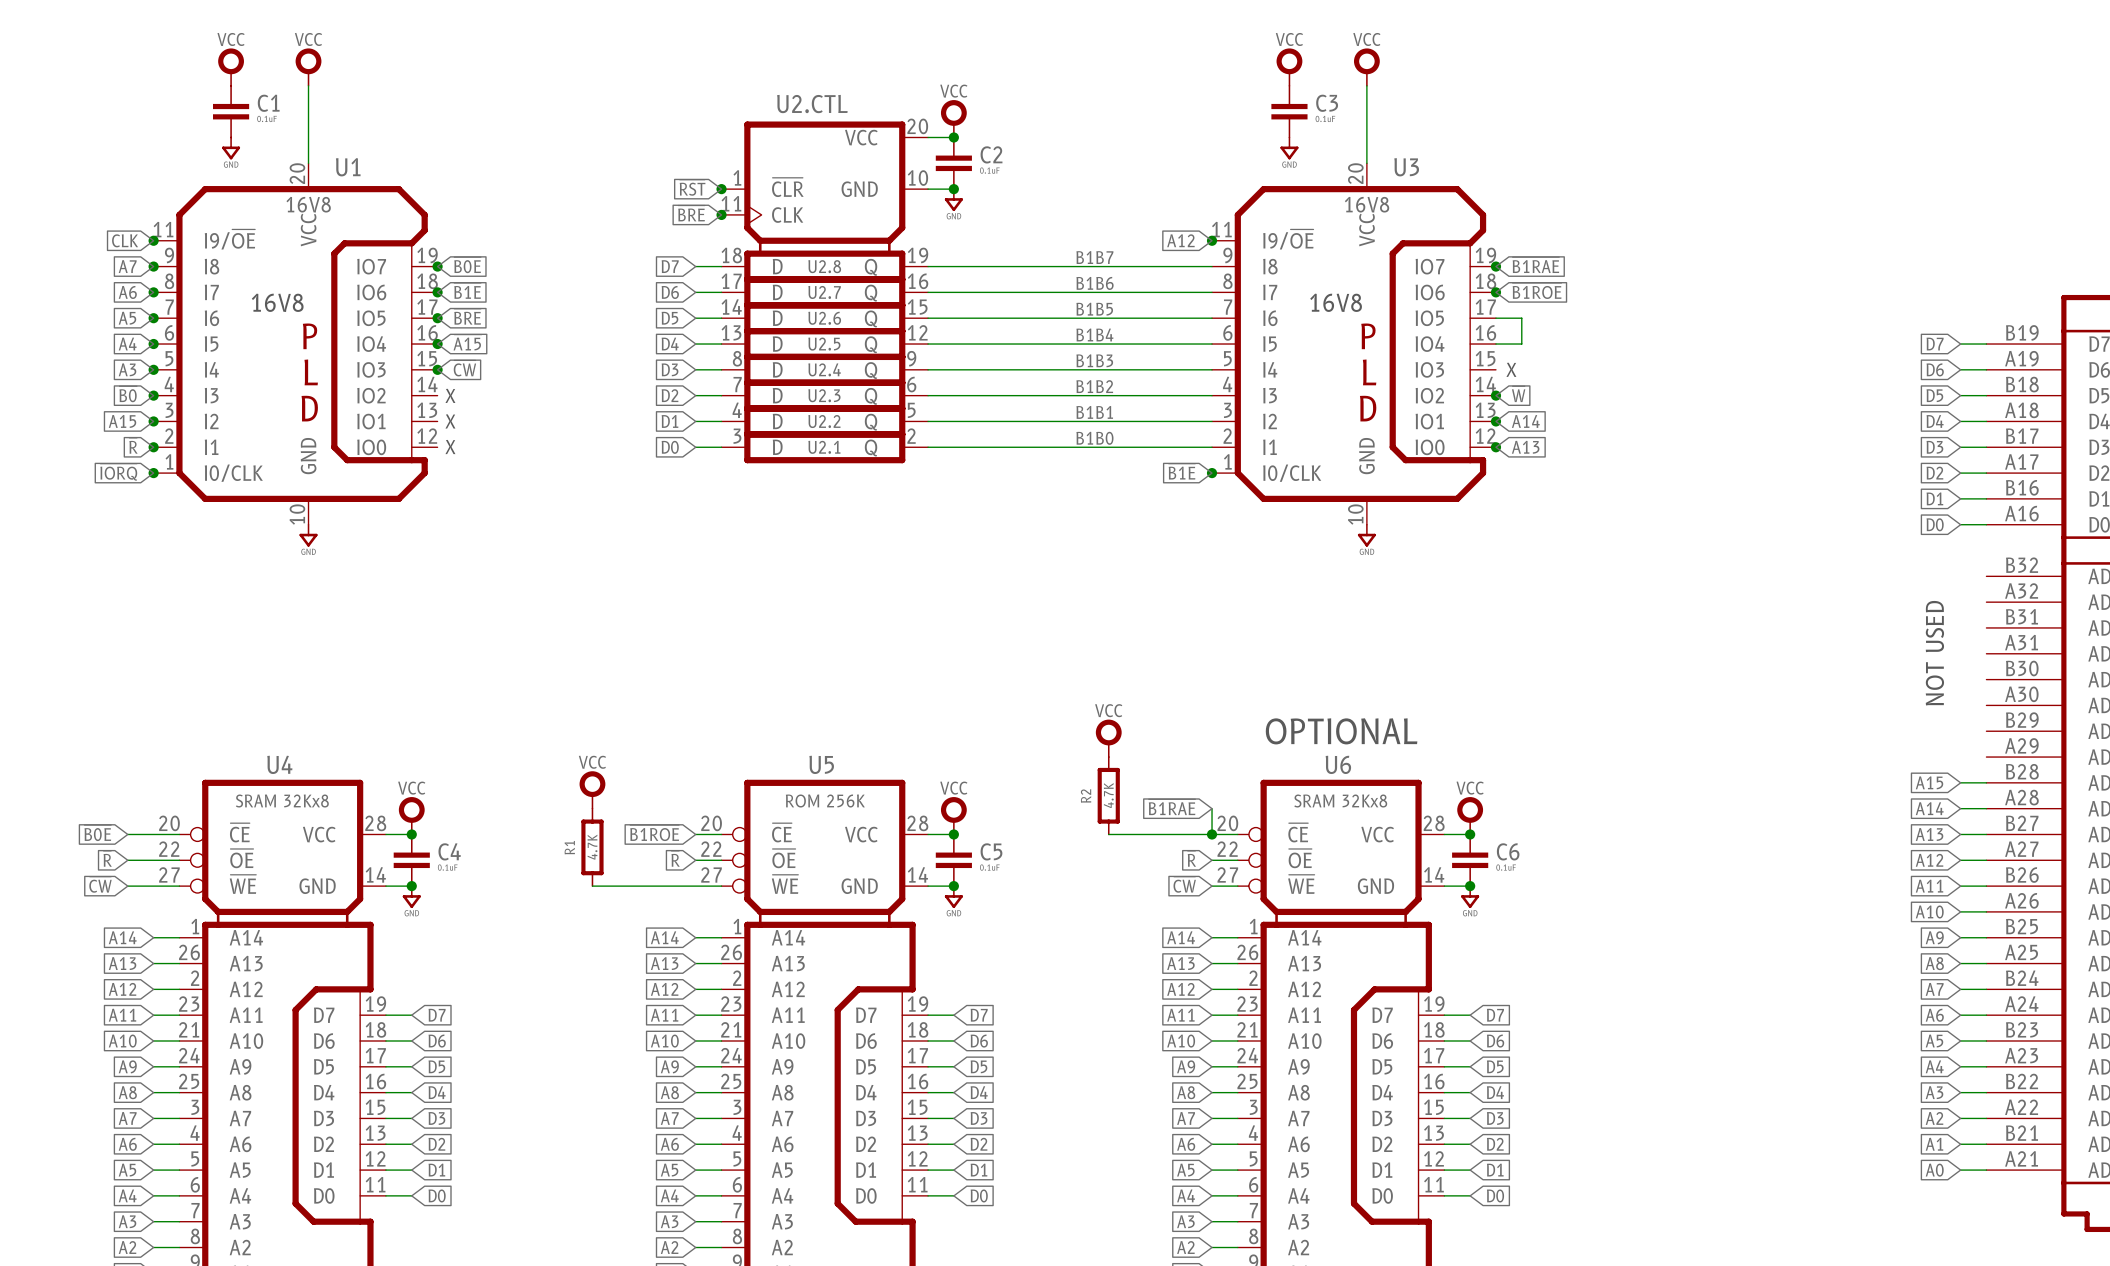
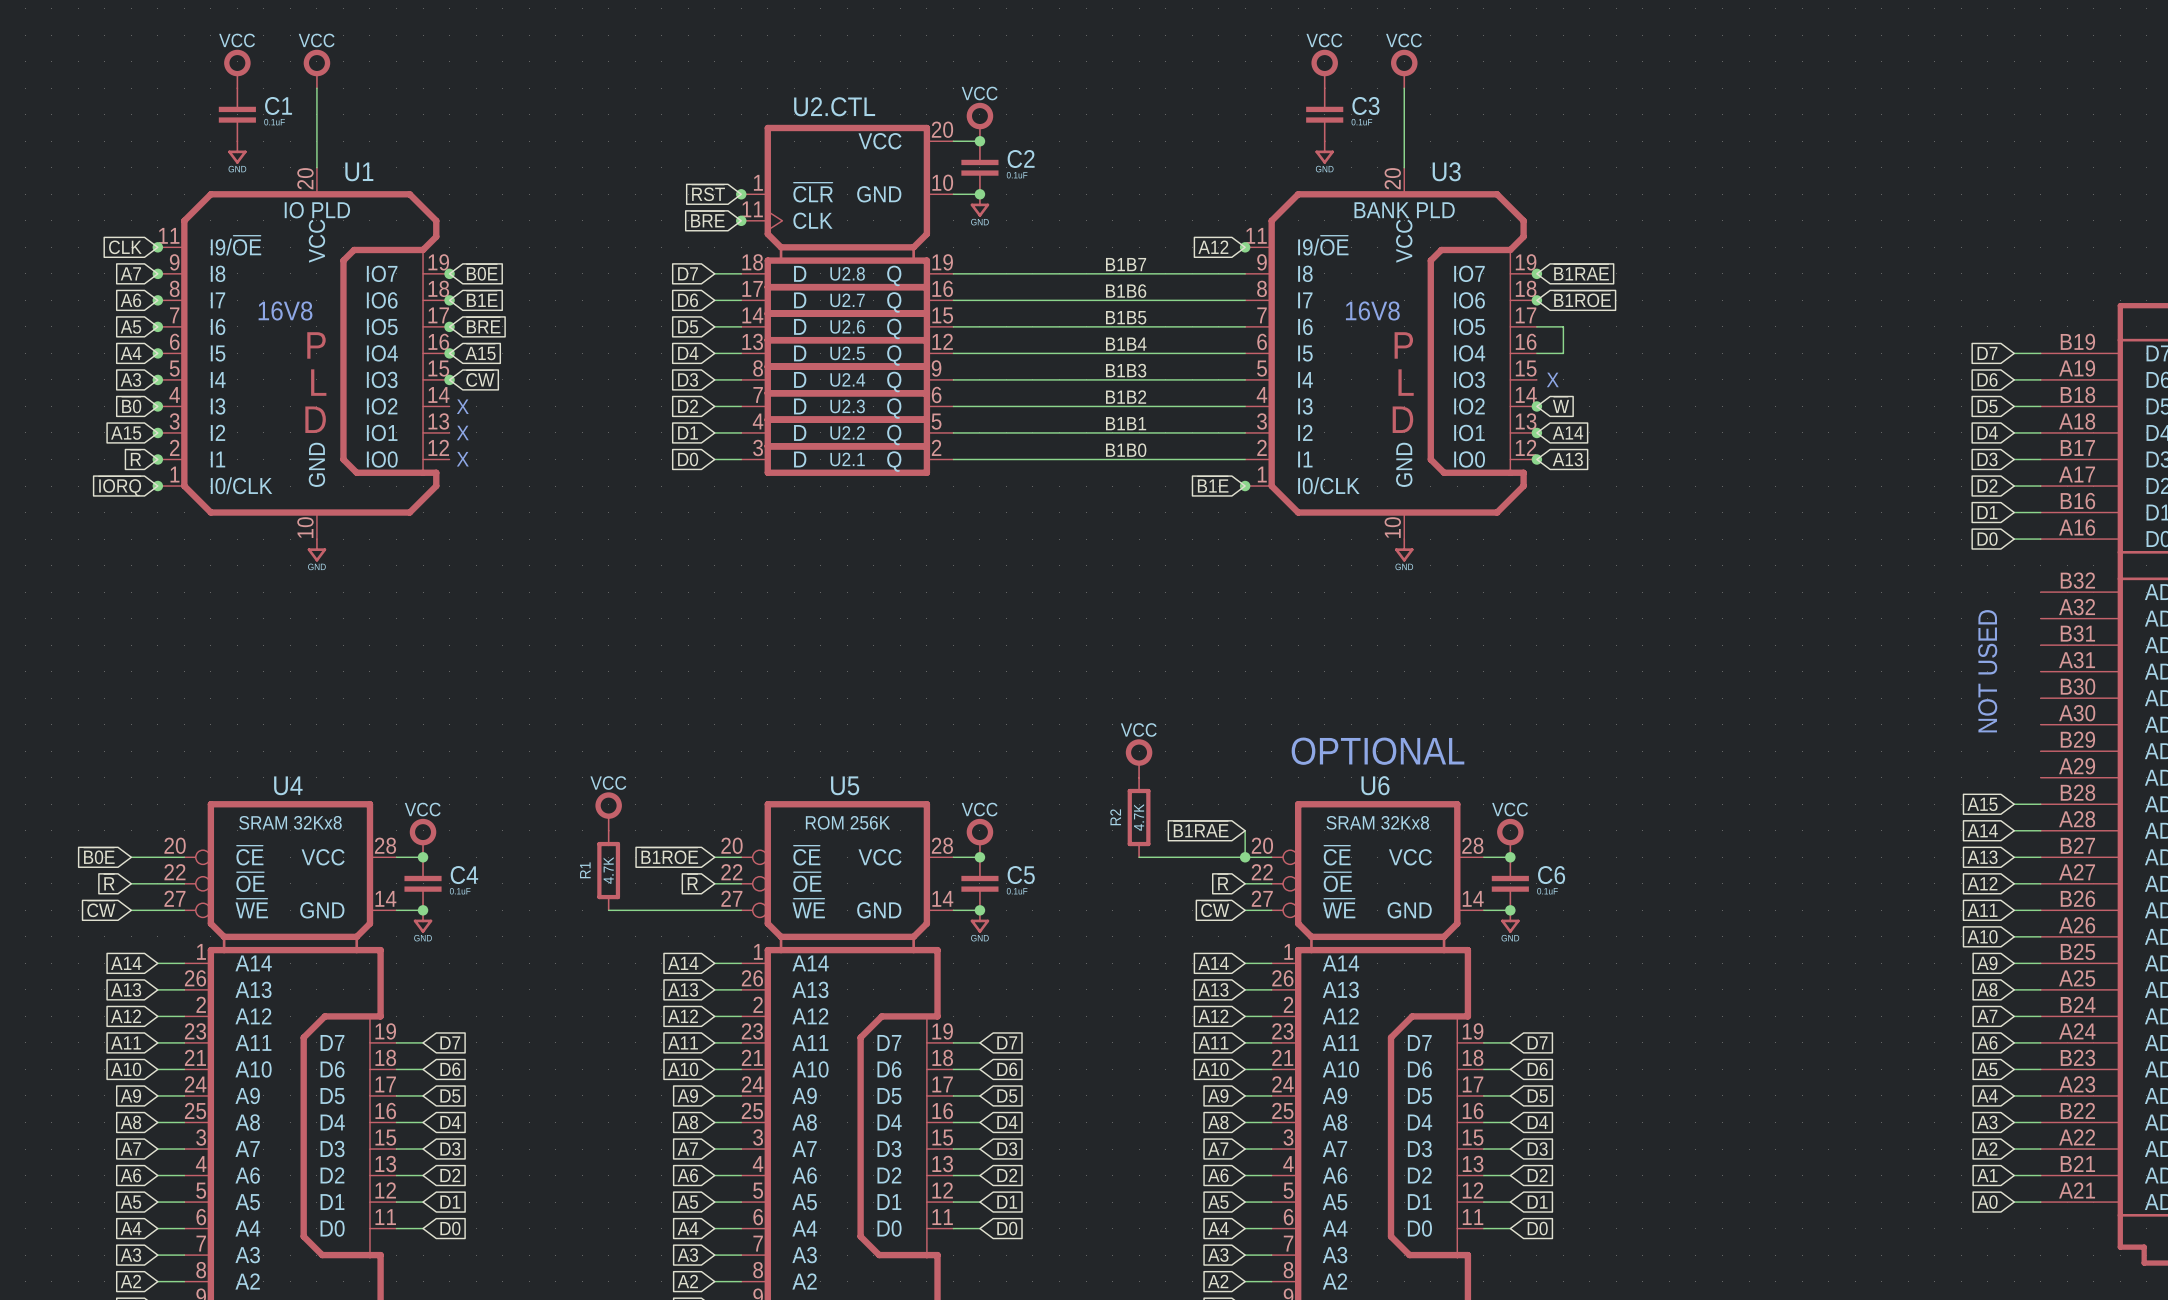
U1 value: 16V8 (308, 204) -> IO PLD (317, 210)
U3 value: 16V8 (1367, 204) -> BANK PLD (1404, 210)

